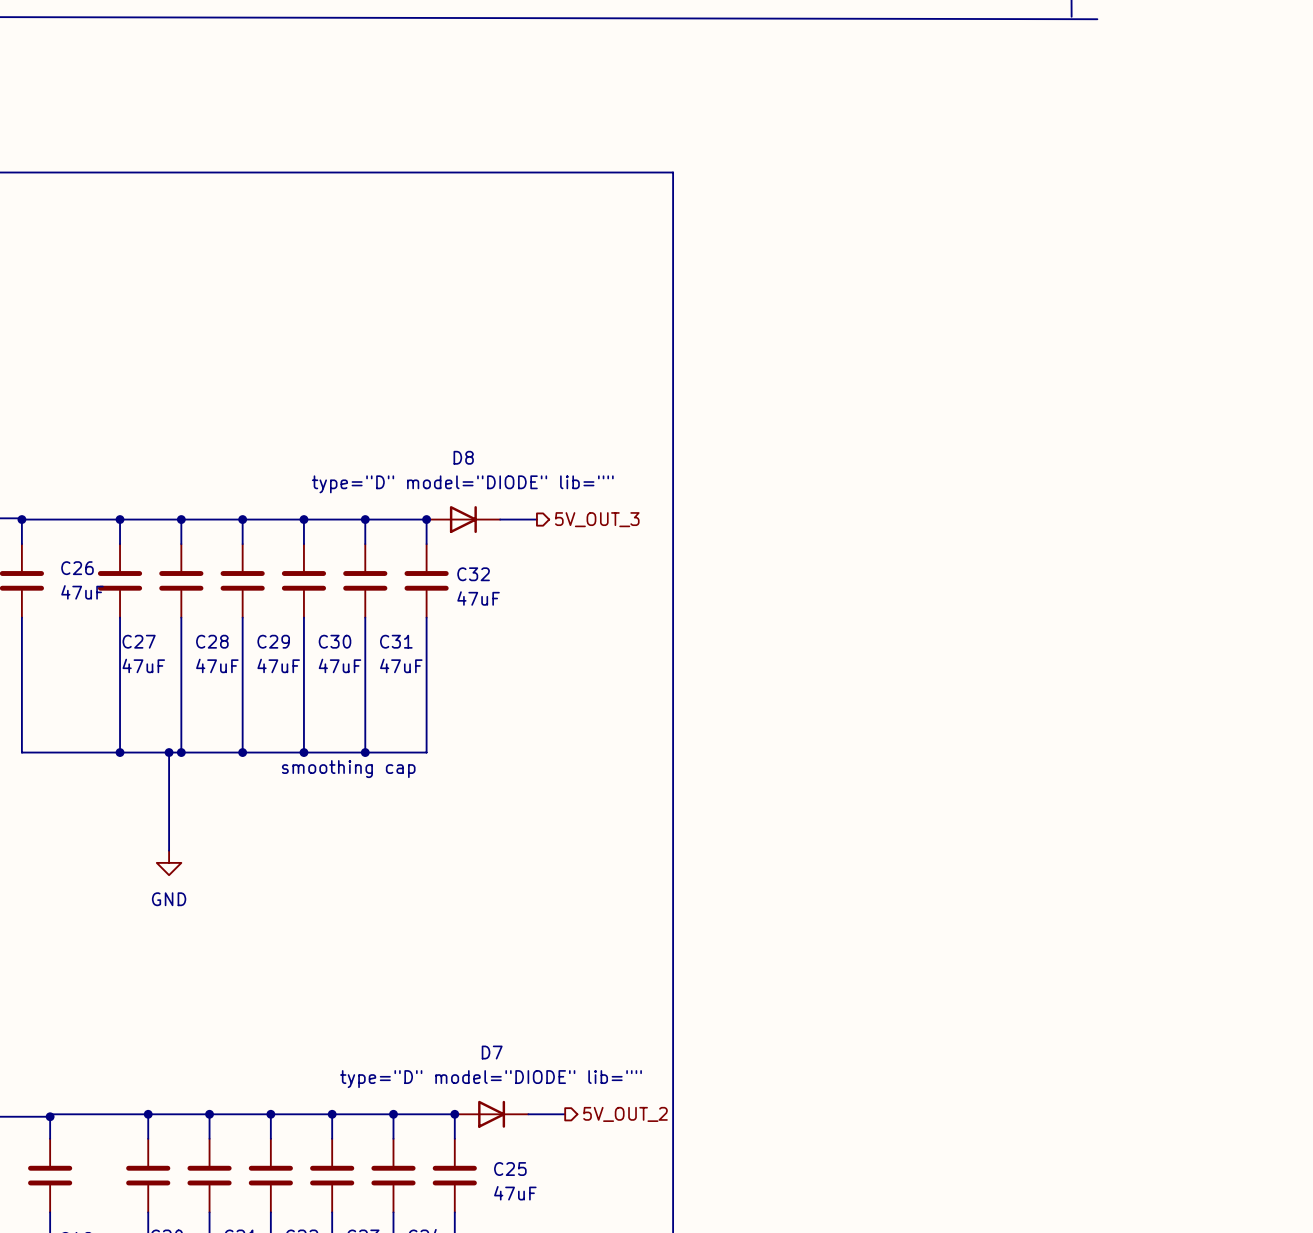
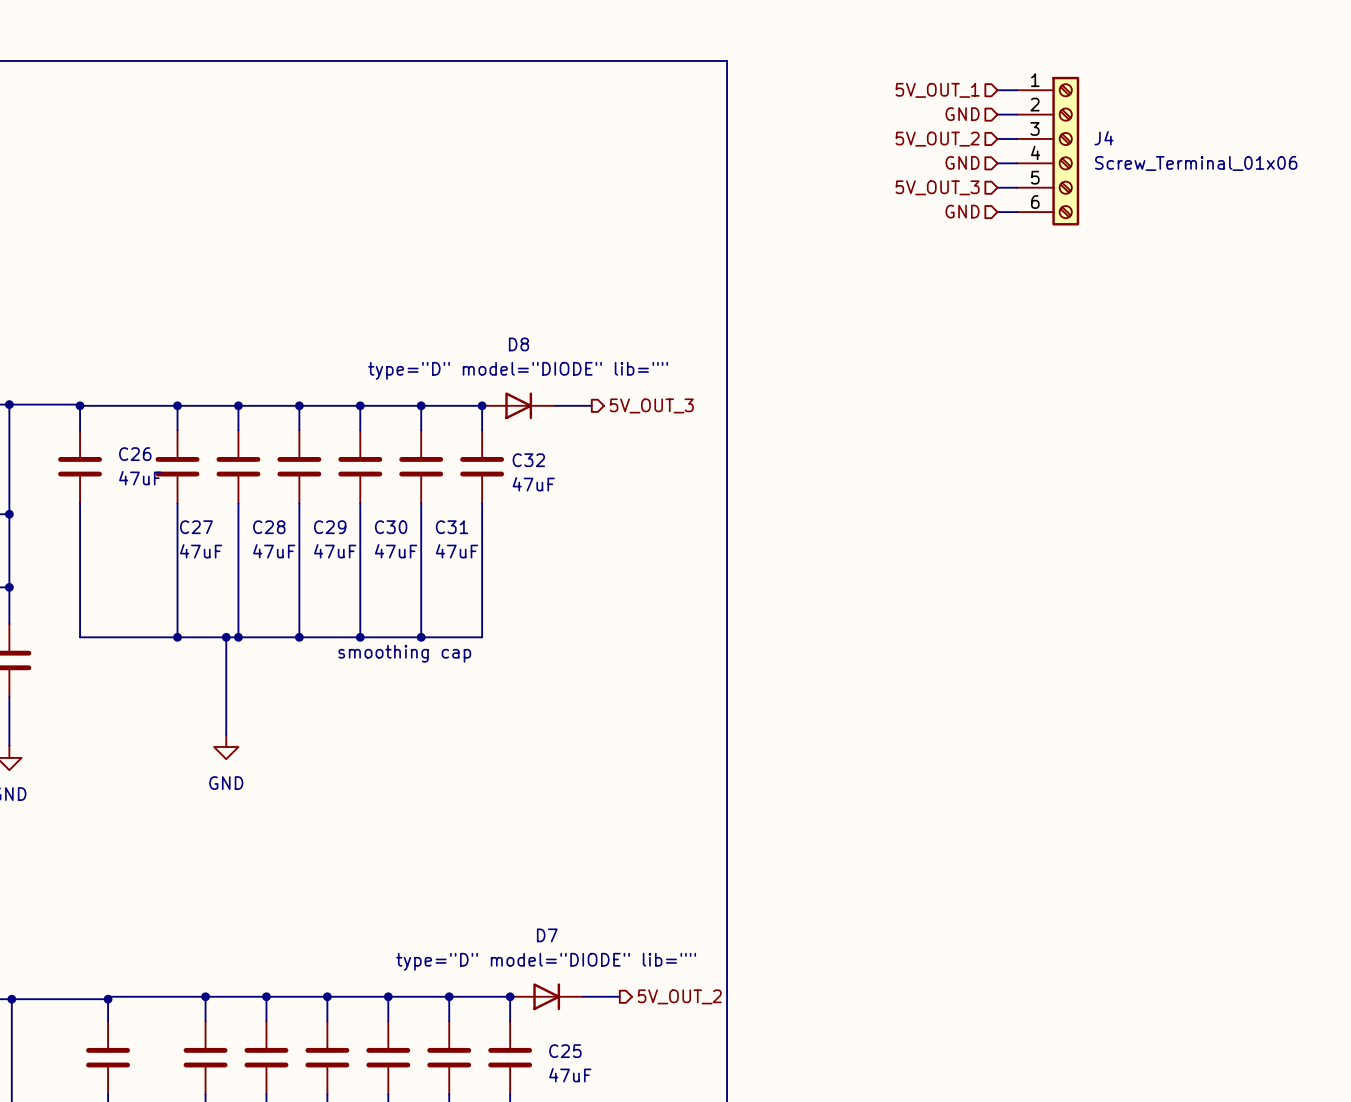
wire: none -> (997, 90) (1017, 90)
hierarchical label: none -> 5V_OUT_1 (937, 90)
hierarchical label: none -> GND (962, 114)
wire: none -> (997, 114) (1017, 114)
wire: none -> (997, 138) (1017, 138)
hierarchical label: none -> 5V_OUT_2 (937, 139)
J4: none -> Screw_Terminal_01x06 (1048, 151)
hierarchical label: none -> GND (962, 162)
wire: none -> (997, 163) (1017, 163)
hierarchical label: none -> 5V_OUT_3 (937, 187)
wire: none -> (997, 187) (1017, 187)
hierarchical label: none -> GND (962, 211)
wire: none -> (997, 212) (1017, 212)

